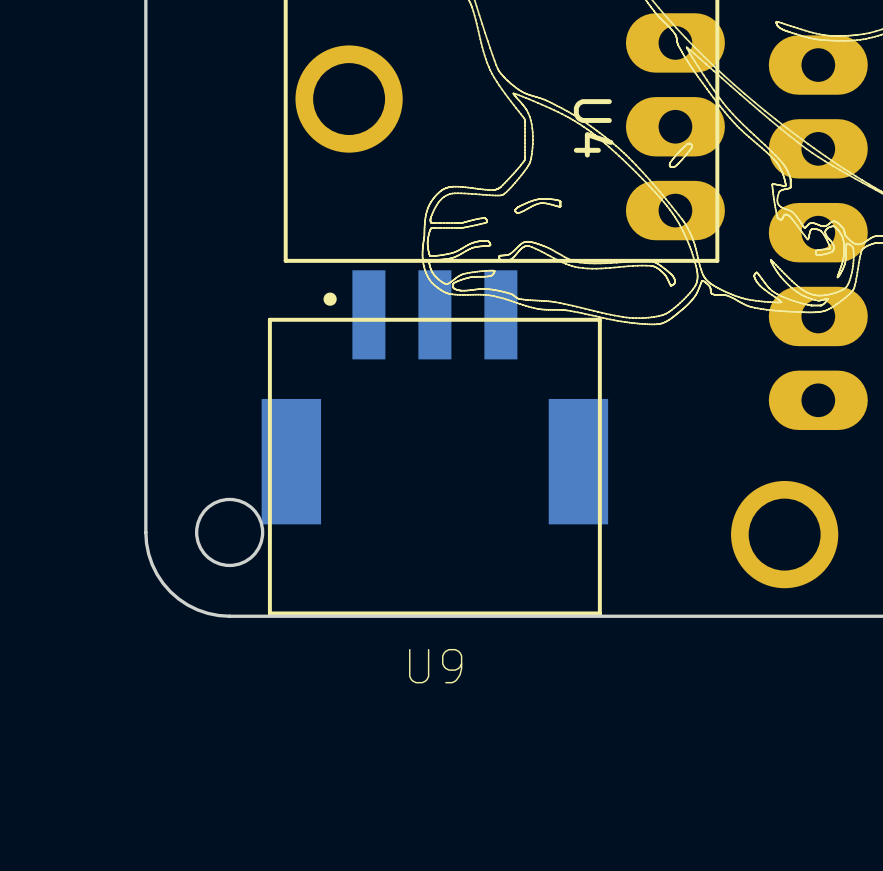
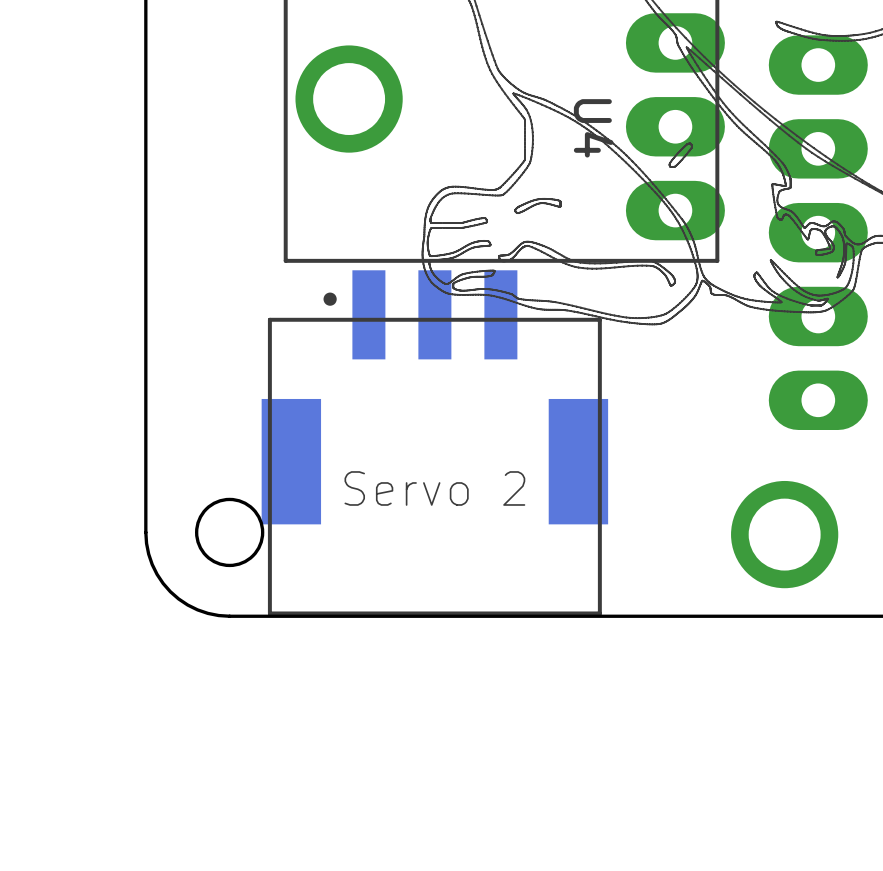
U9 name: U9 (435, 666) -> Servo 2 (434, 488)

